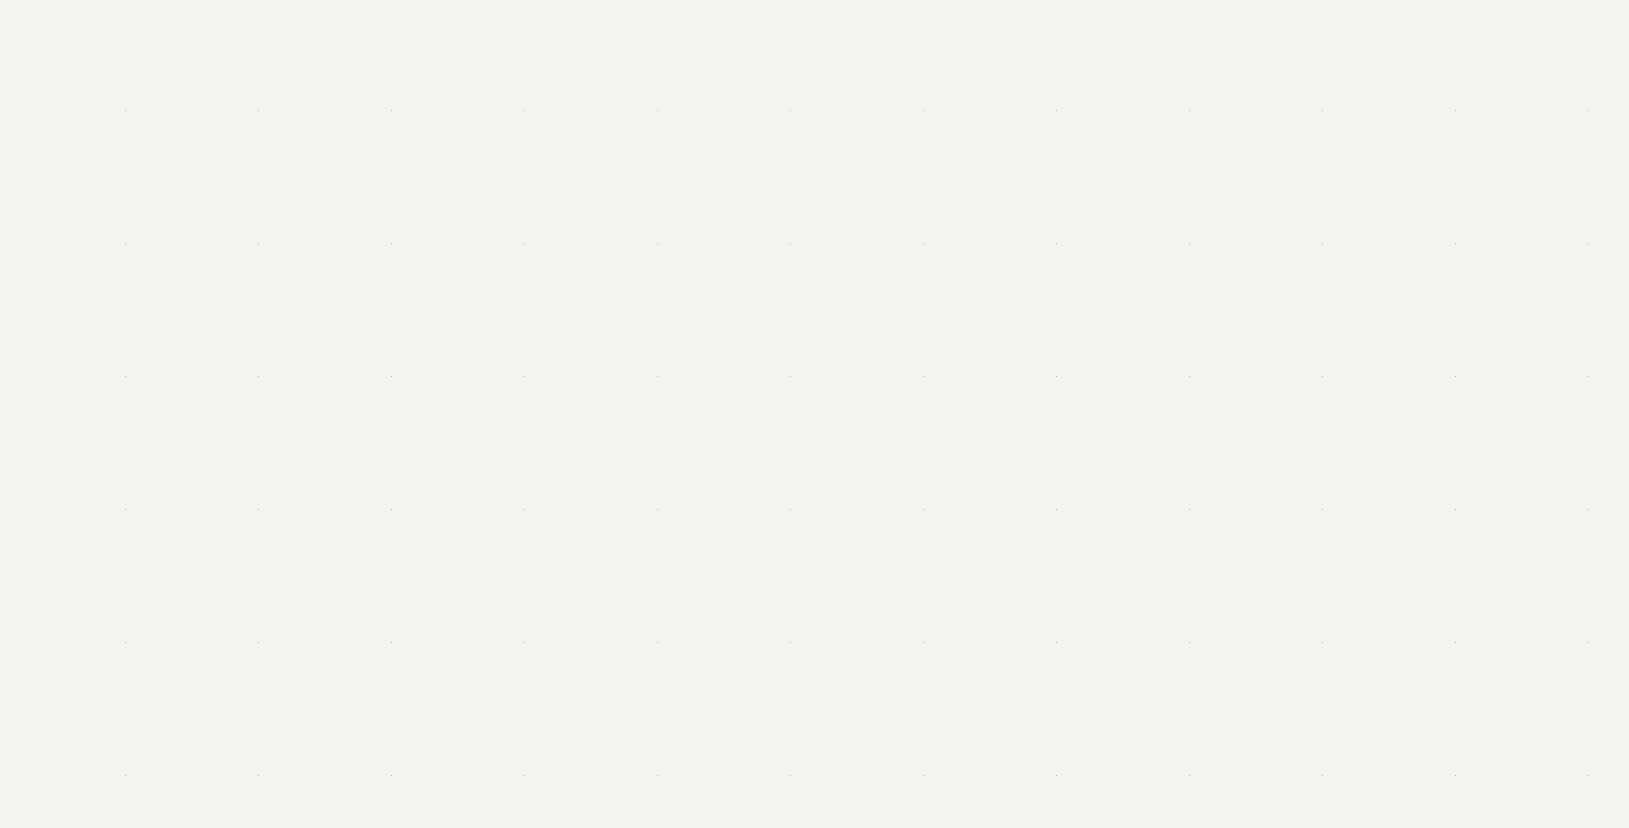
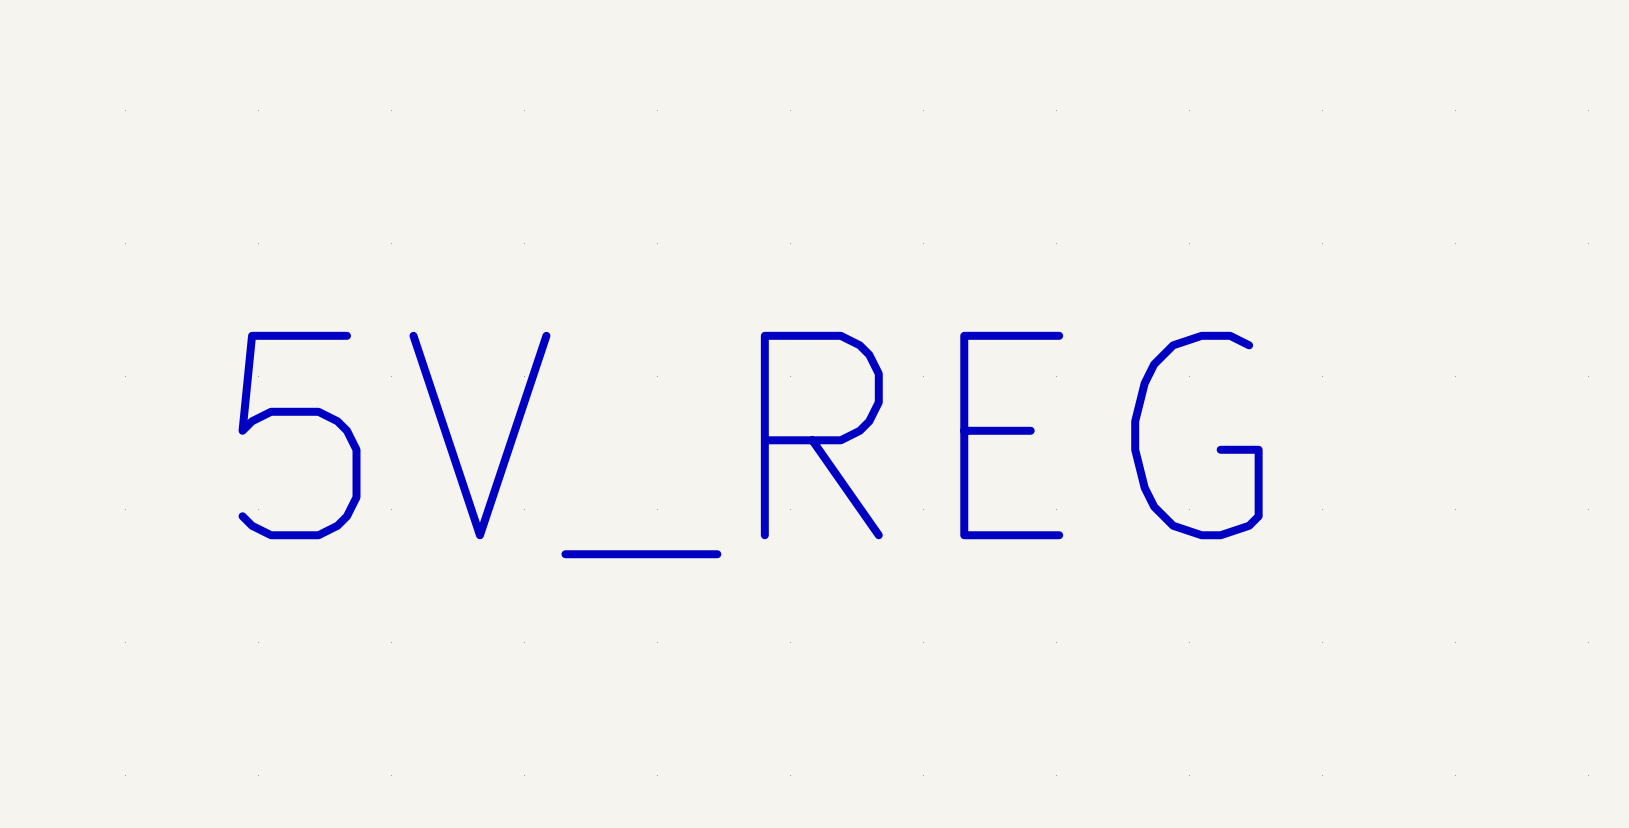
text: none -> 5V_REG (750, 445)

